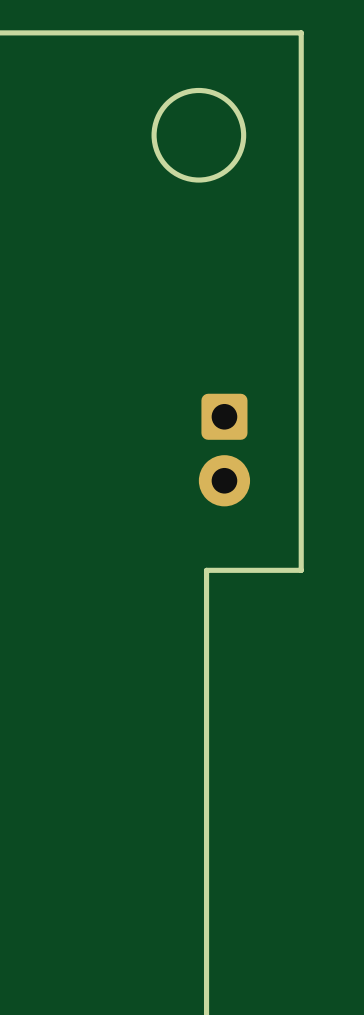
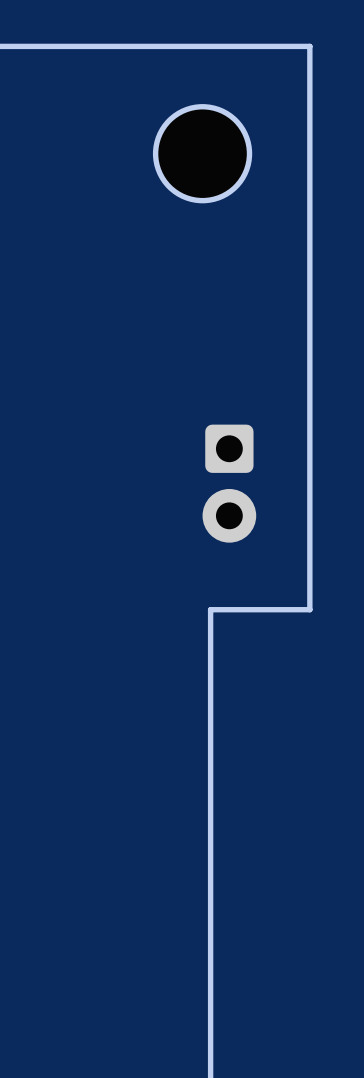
part: none -> (202, 153)

